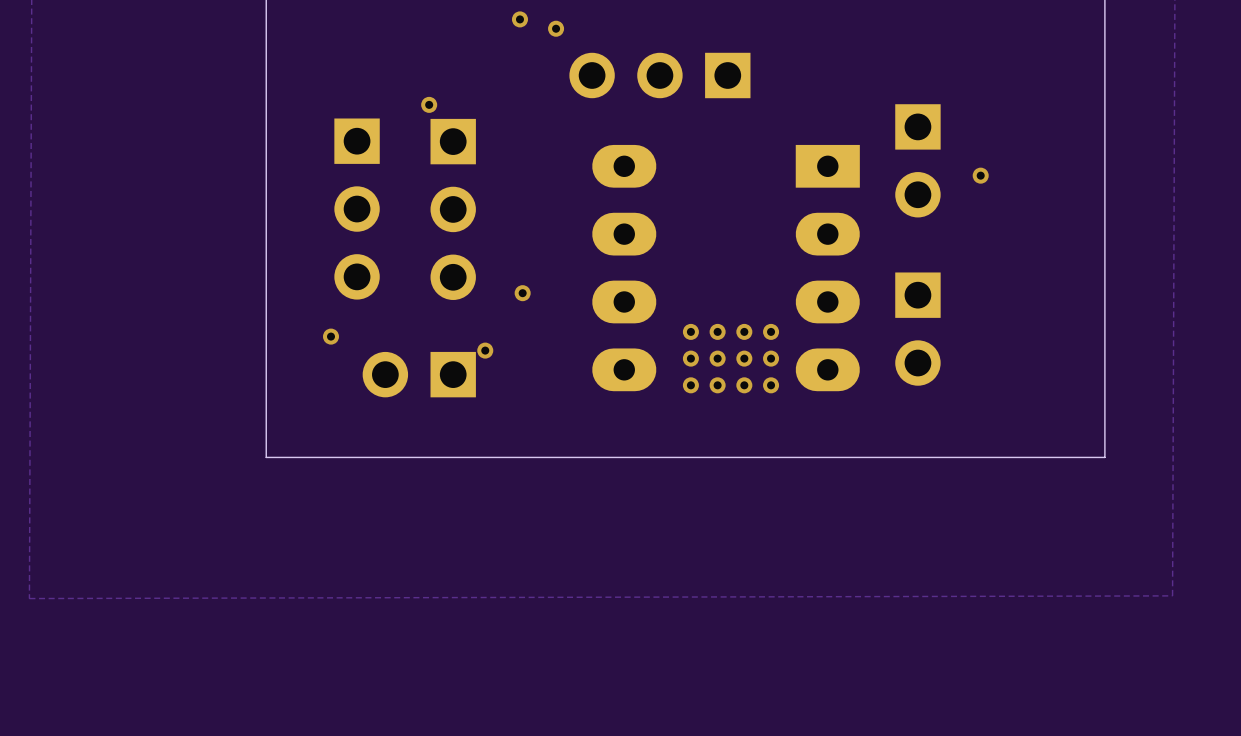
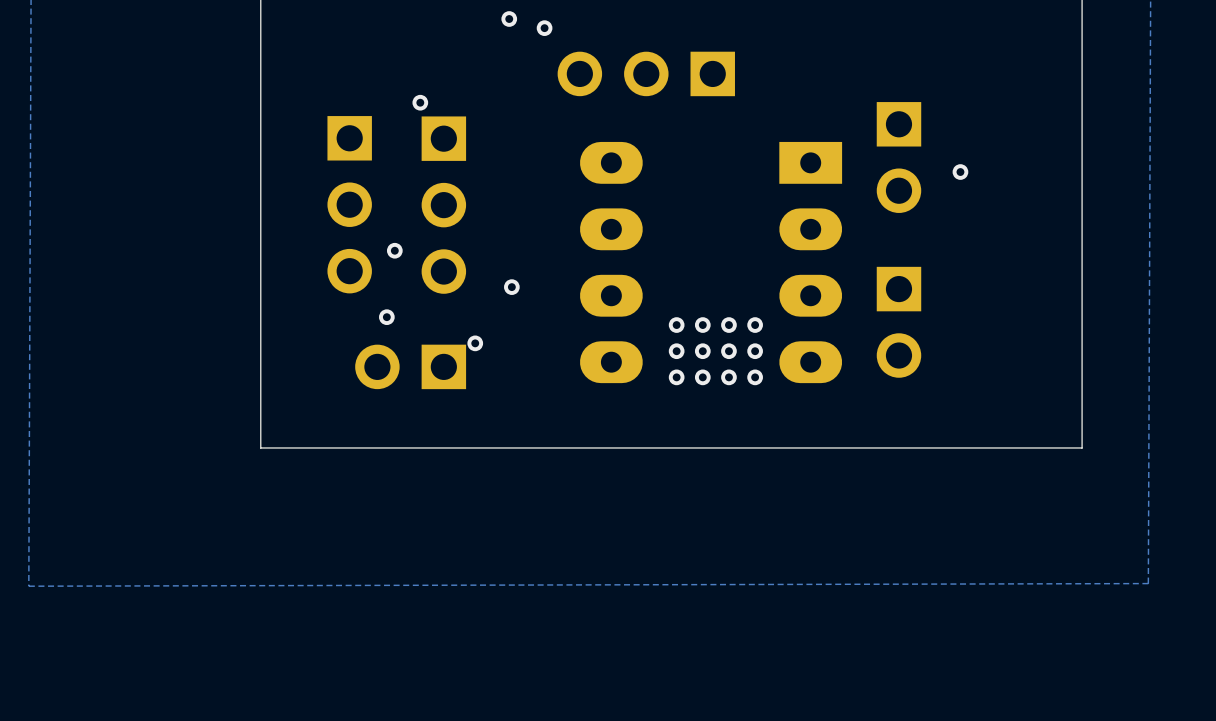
via: none -> (394, 250)
via: none -> (386, 317)
via: (331, 336) -> none

